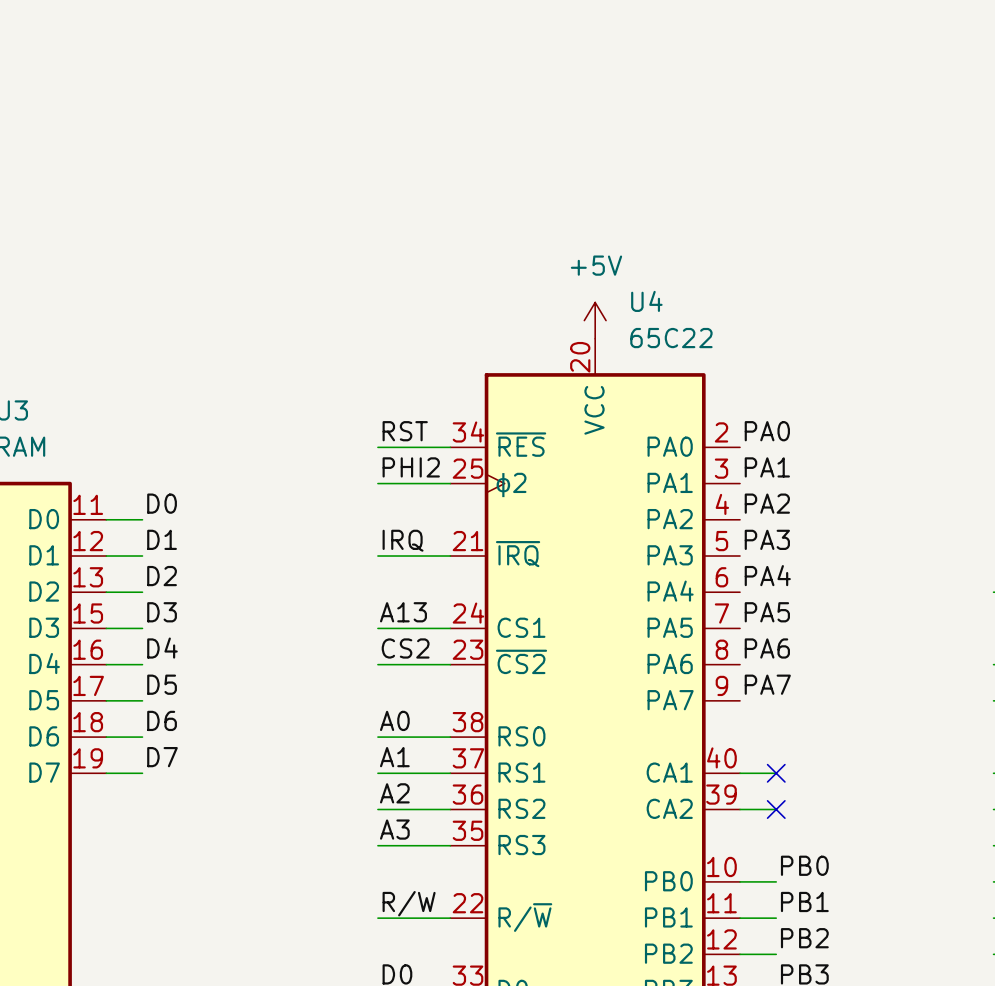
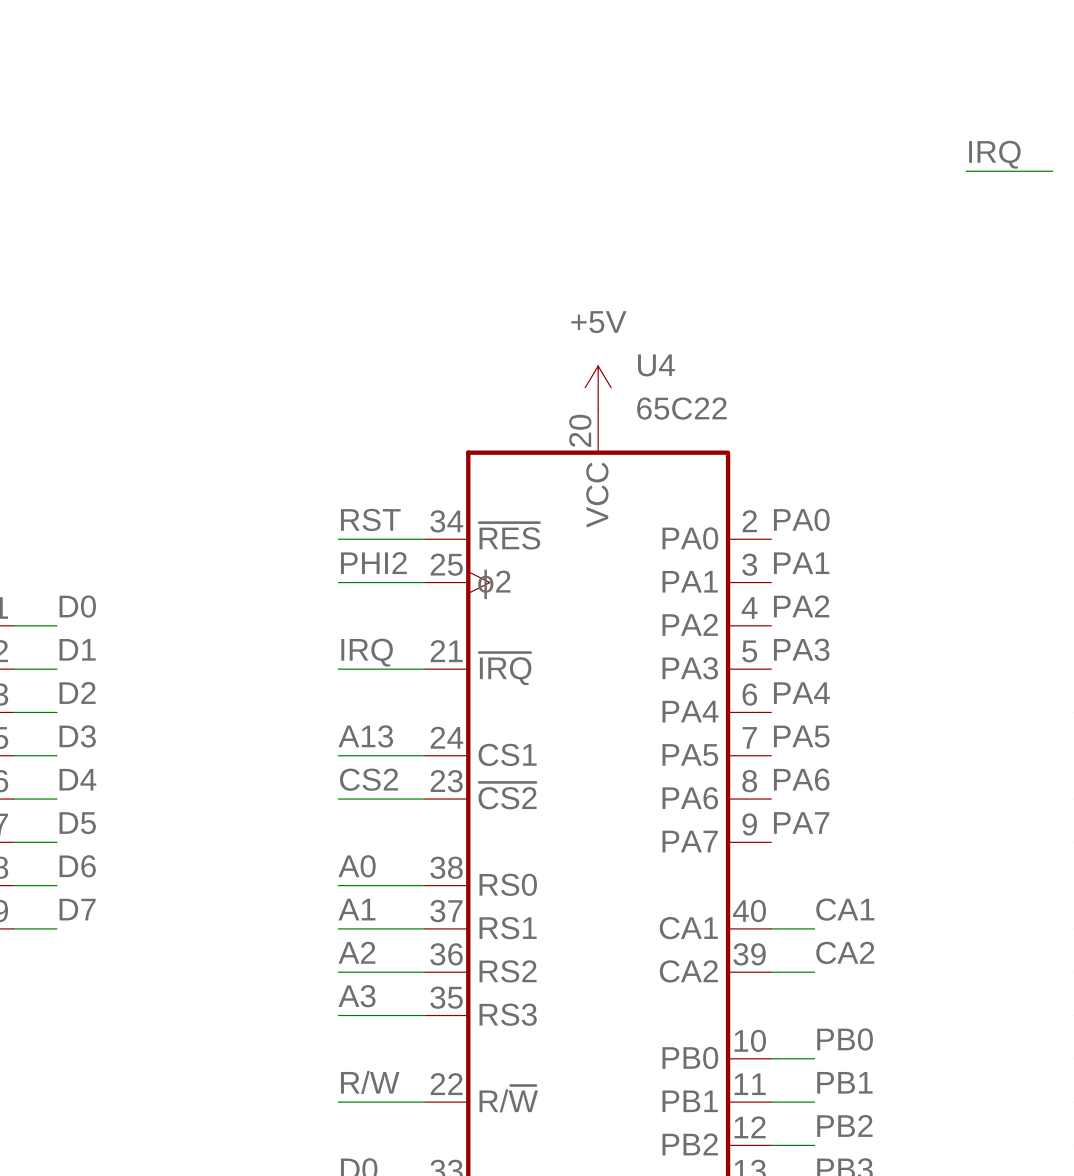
label: none -> IRQ (994, 154)
wire: none -> (966, 171) (1052, 171)
label: none -> CA1 (845, 909)
no-connect mark: (776, 773) -> none
label: none -> CA2 (845, 952)
no-connect mark: (776, 809) -> none

